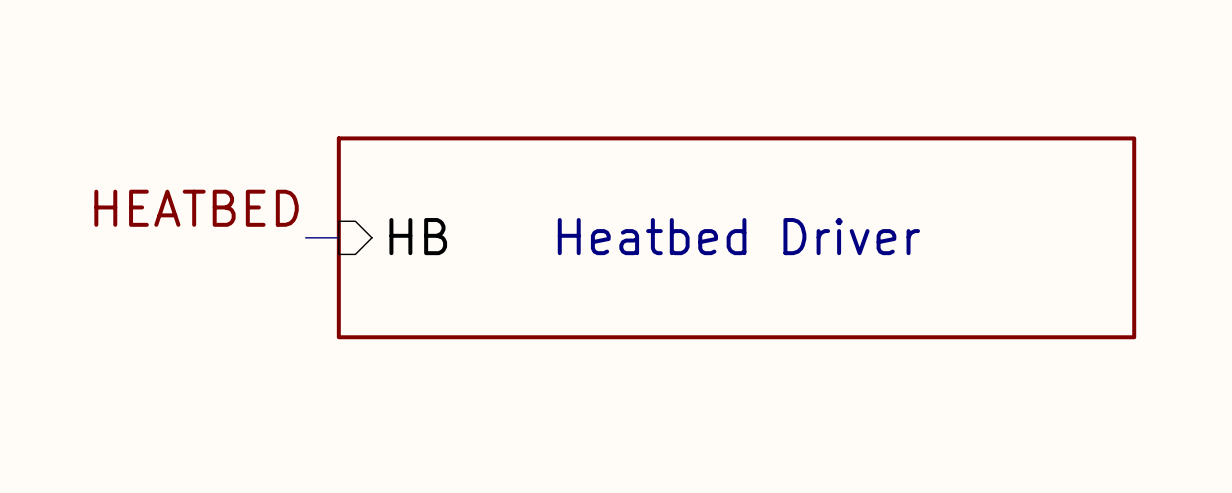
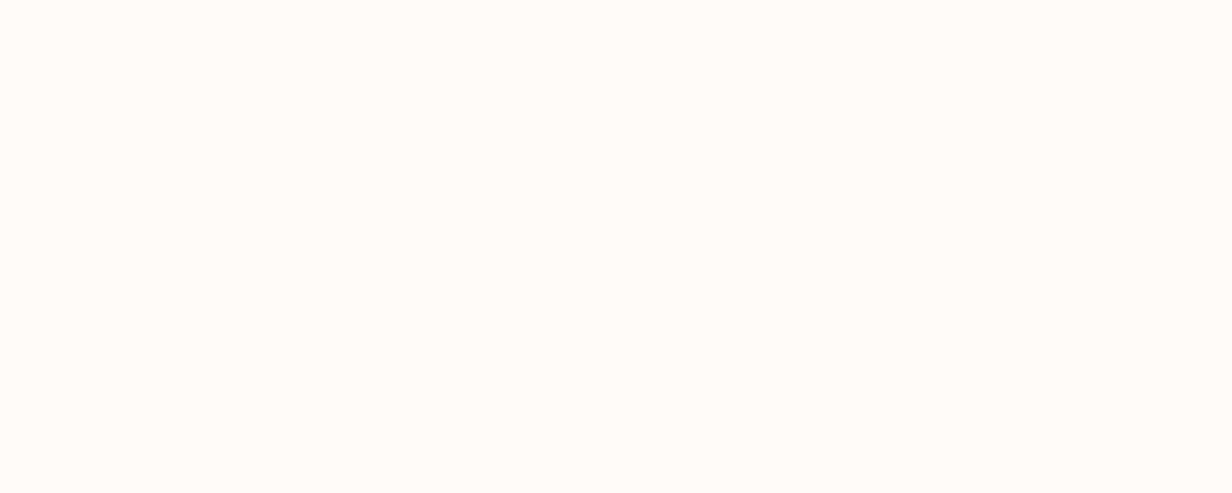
label: HEATBED (196, 208) -> none
sheet pin: HB (418, 236) -> none
wire: (305, 237) (338, 237) -> none
sheet Heatbed Driver: (736, 237) -> none

